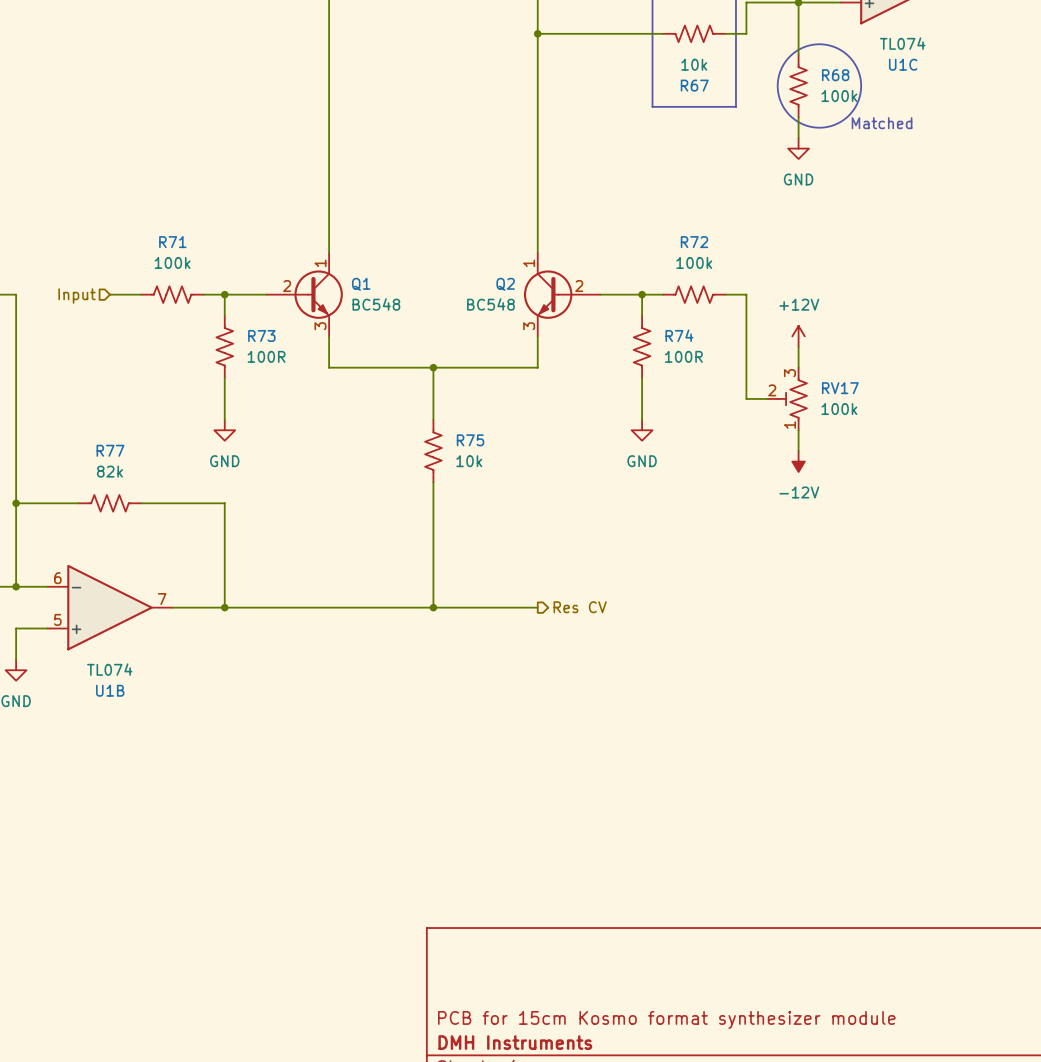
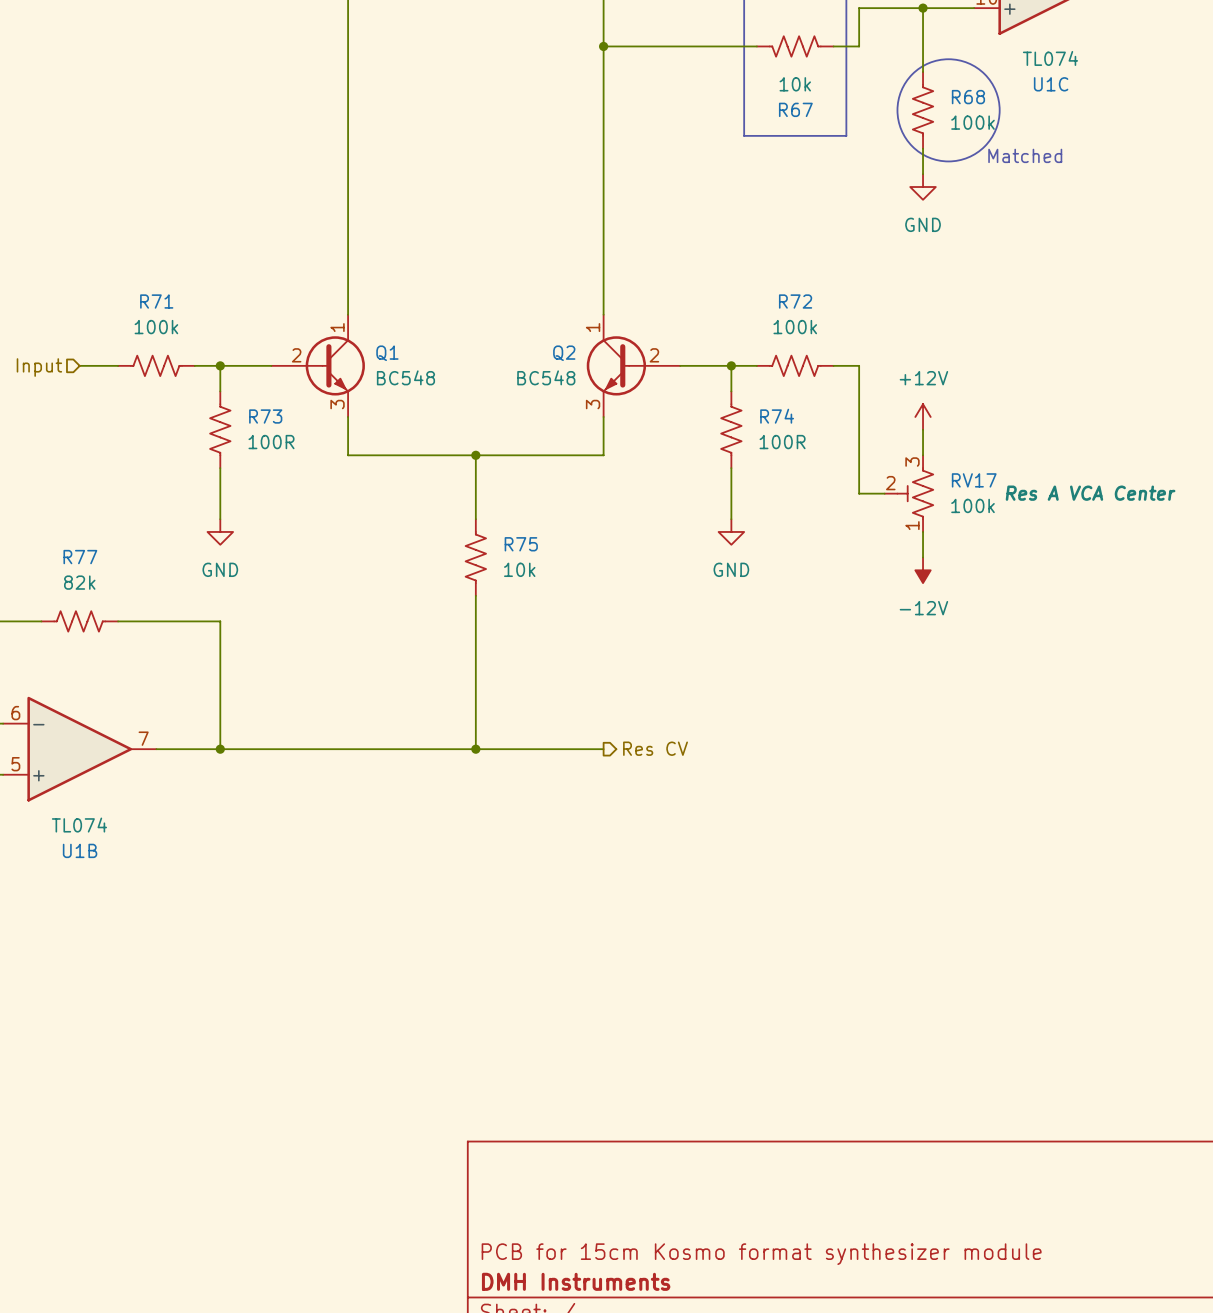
RV17 text: none -> Res A VCA Center (1090, 493)

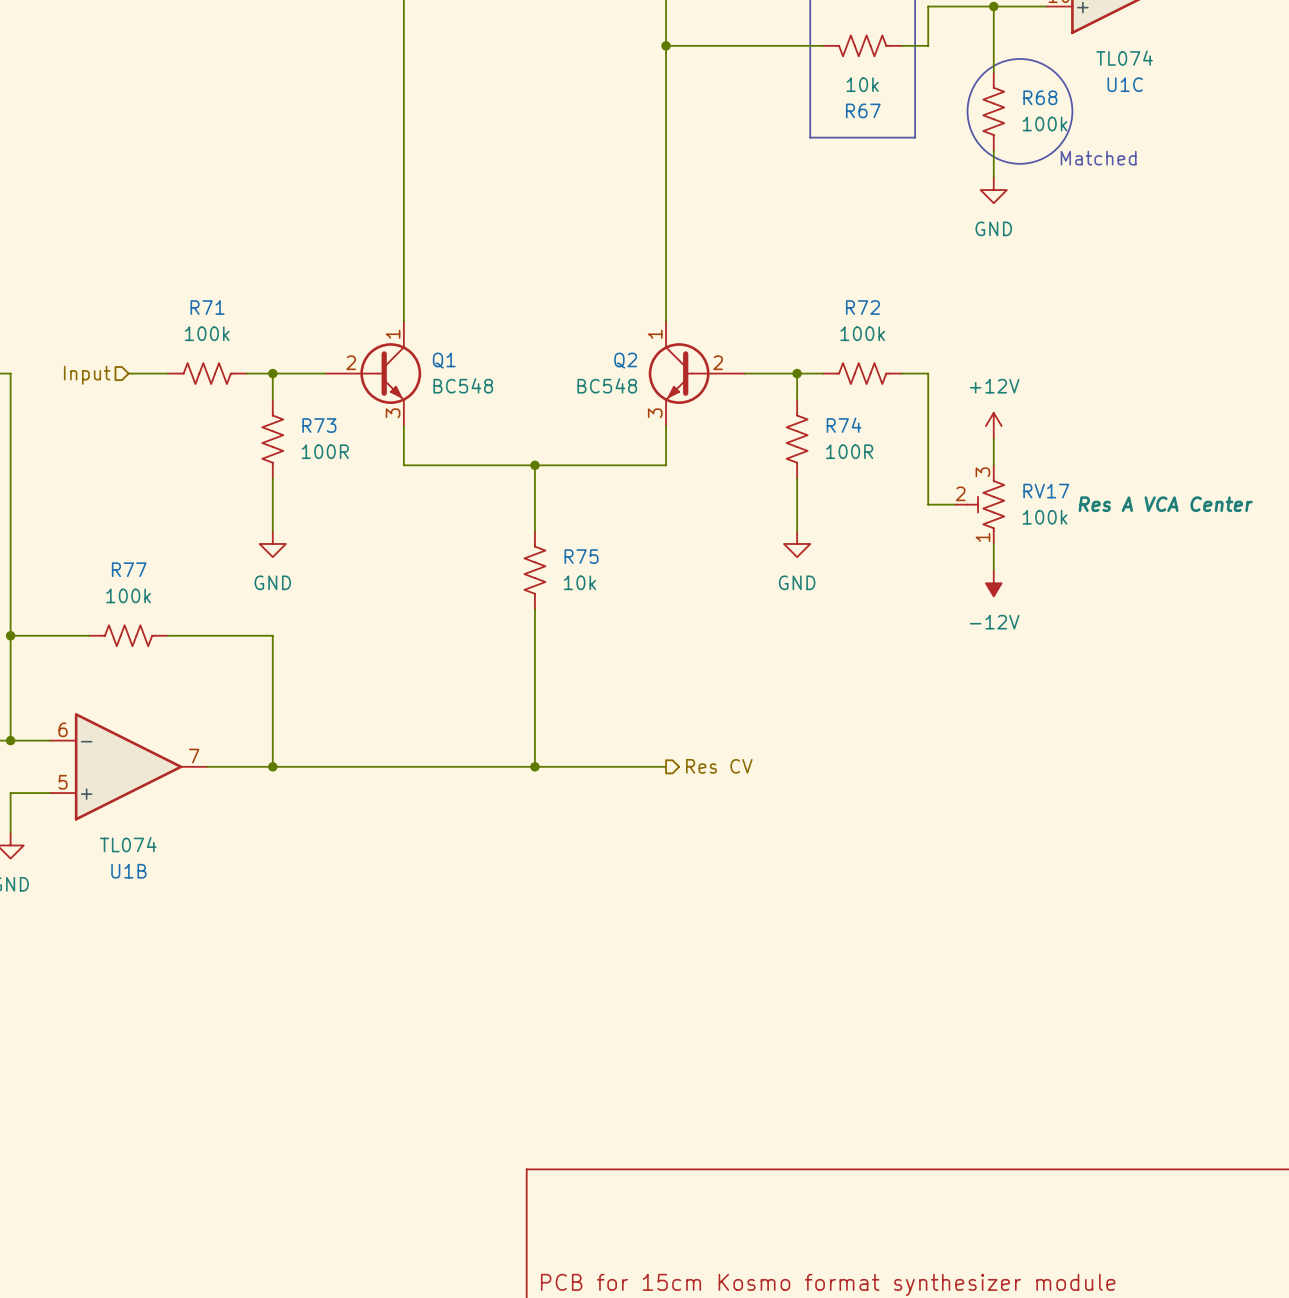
R77 value: 82k (79, 582) -> 100k (128, 595)

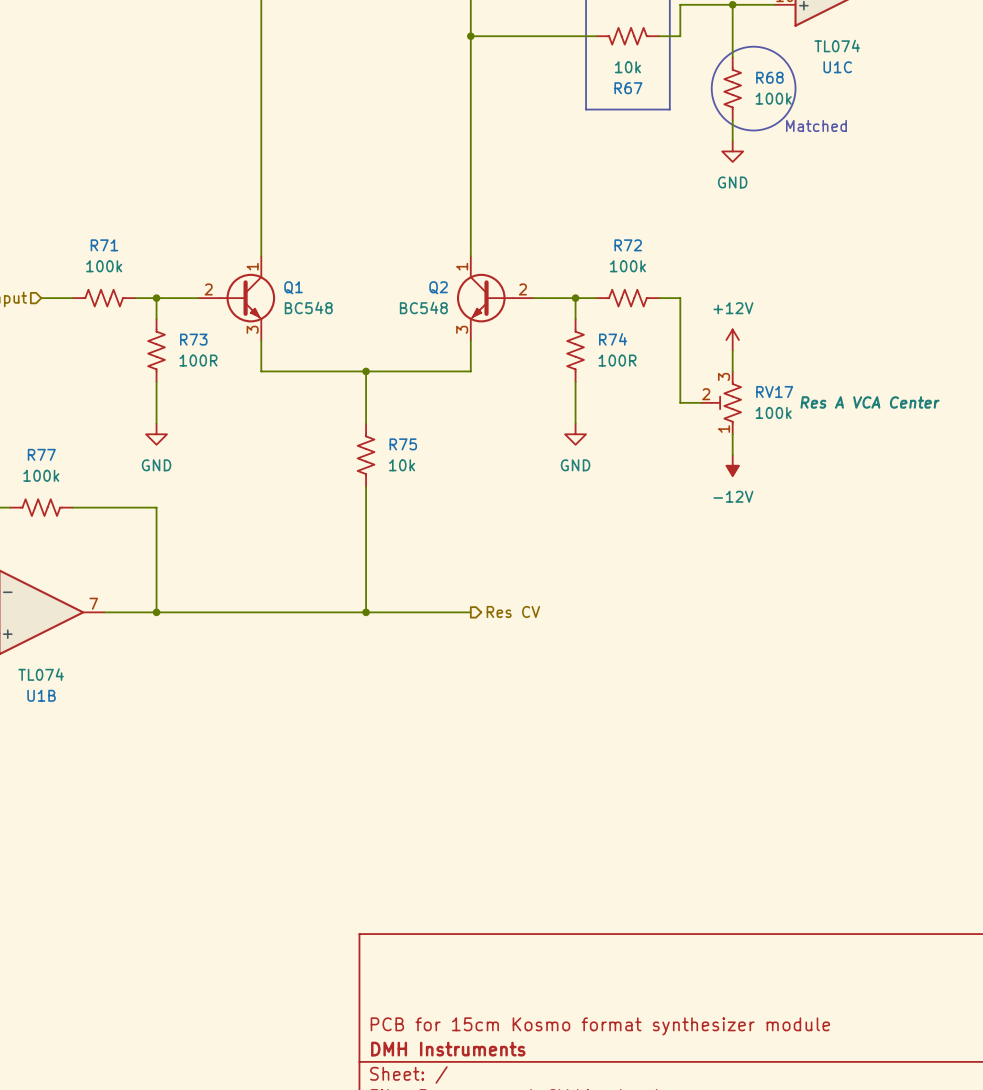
Q1 symbol: [325, 321, 422, 427] -> [198, 256, 276, 341]
Q2 symbol: [648, 321, 745, 427] -> [456, 256, 534, 341]

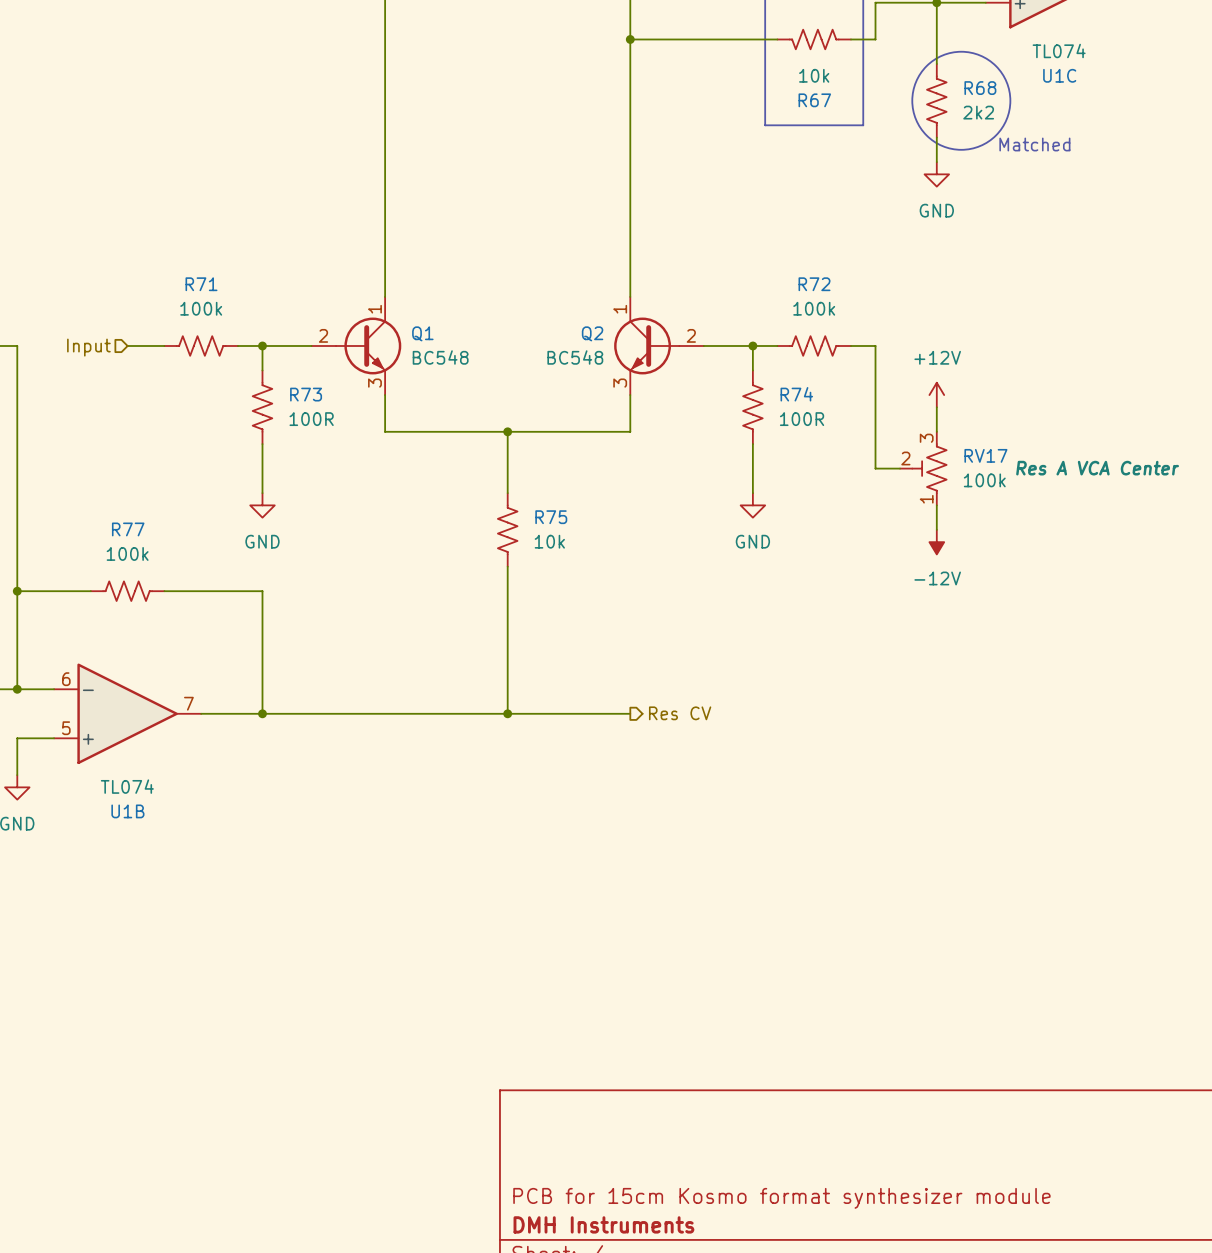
R68 value: 100k (773, 98) -> 2k2 (978, 112)

